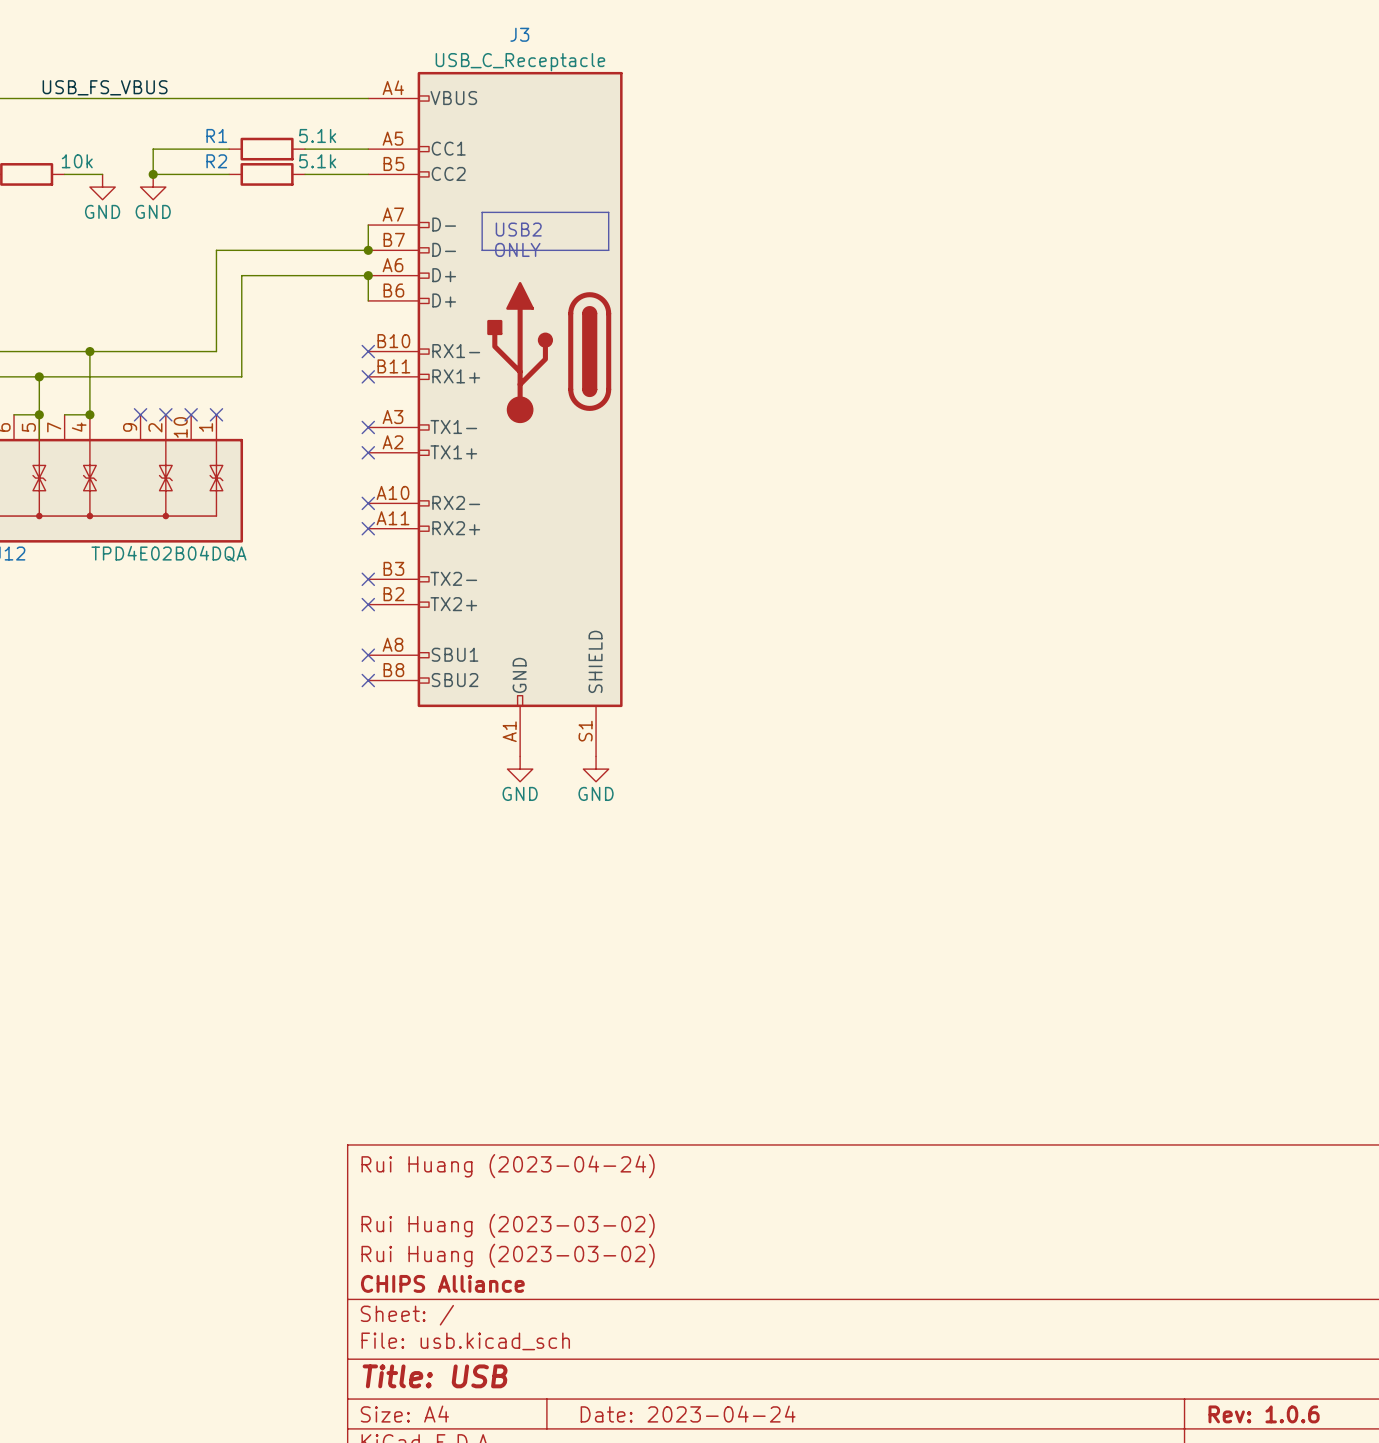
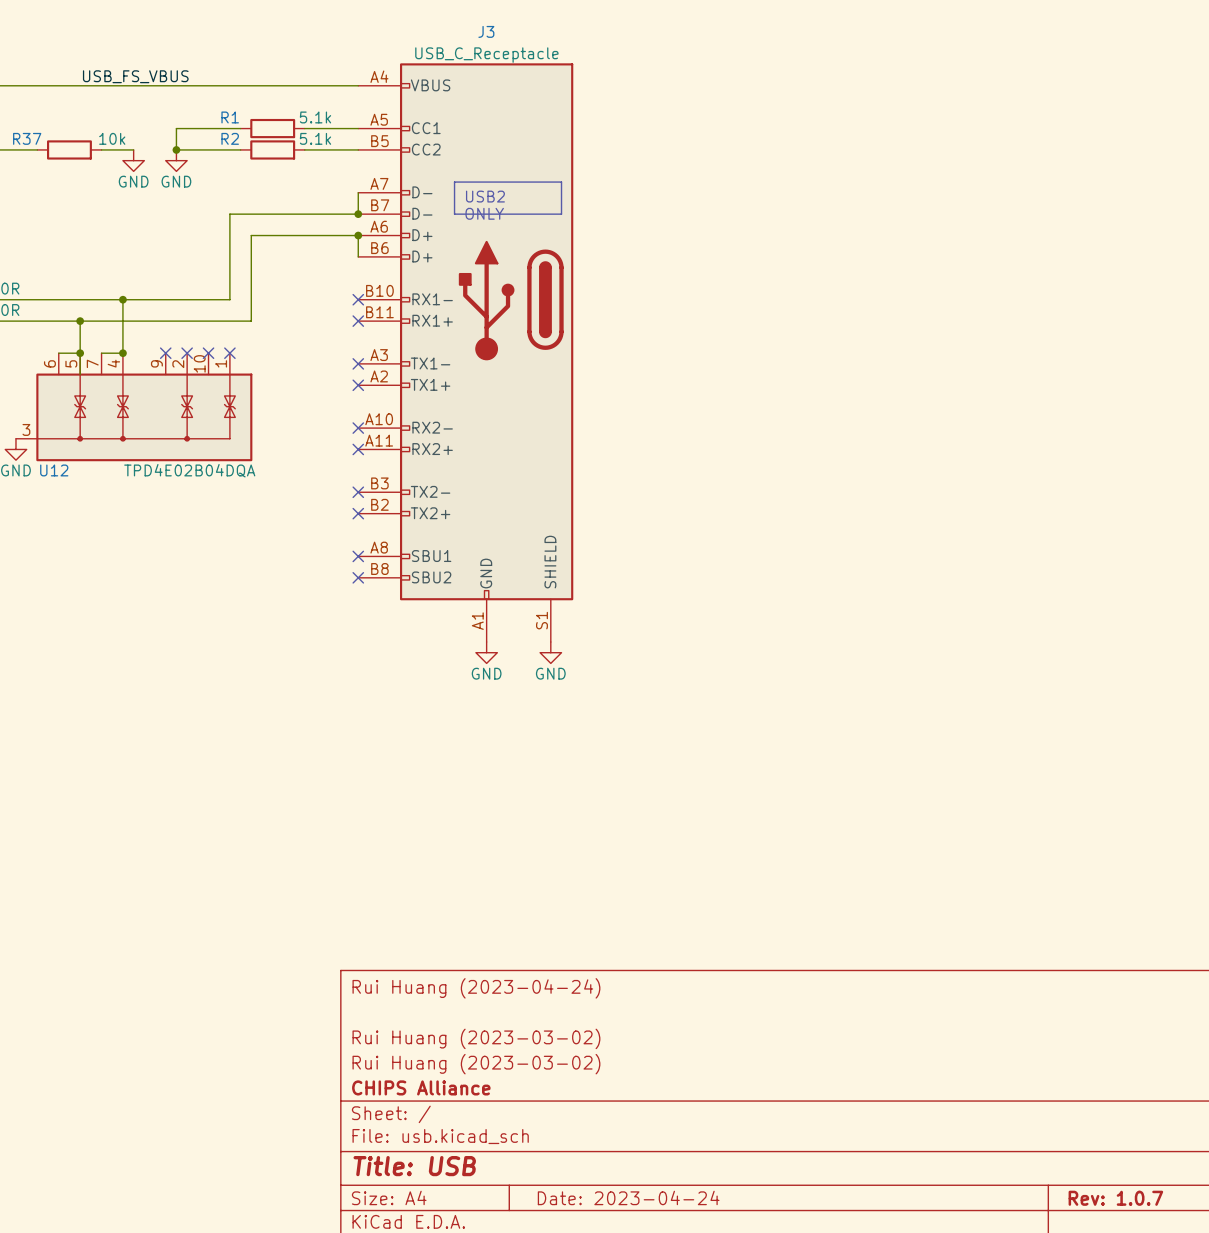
title block: Rev: 1.0.6 (1264, 1414) -> Rev: 1.0.7 (1115, 1198)

